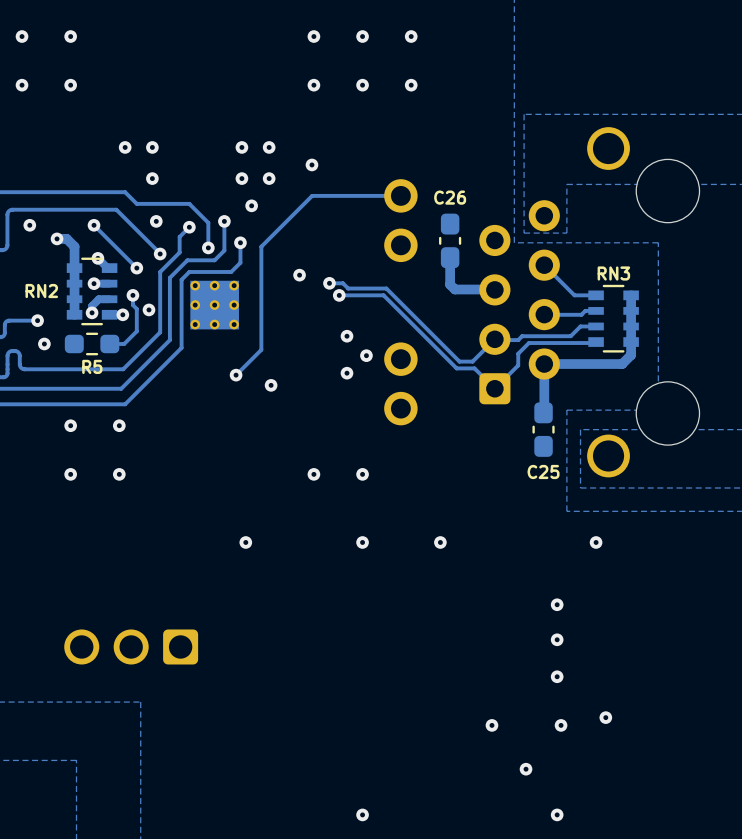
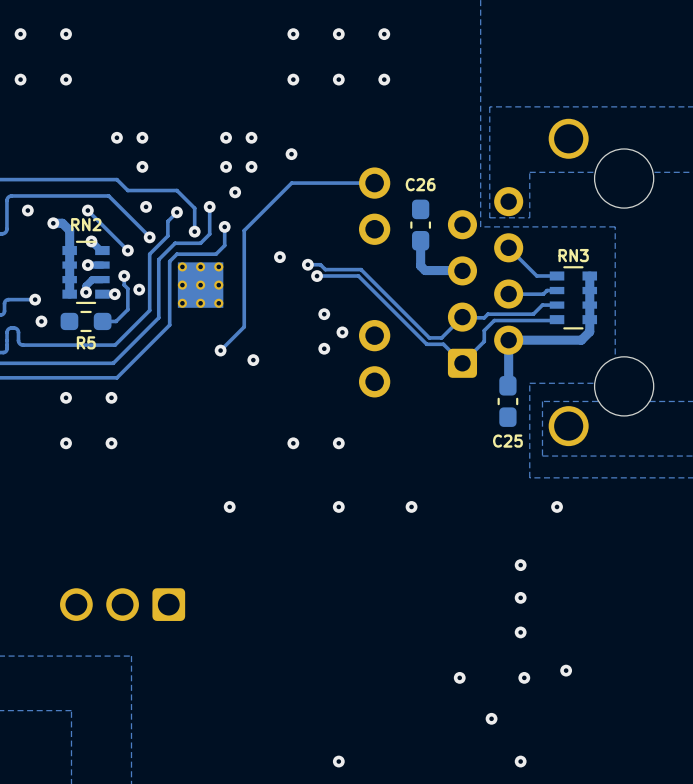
RN2 name position: RN2 (41, 291) -> RN2 (86, 224)

